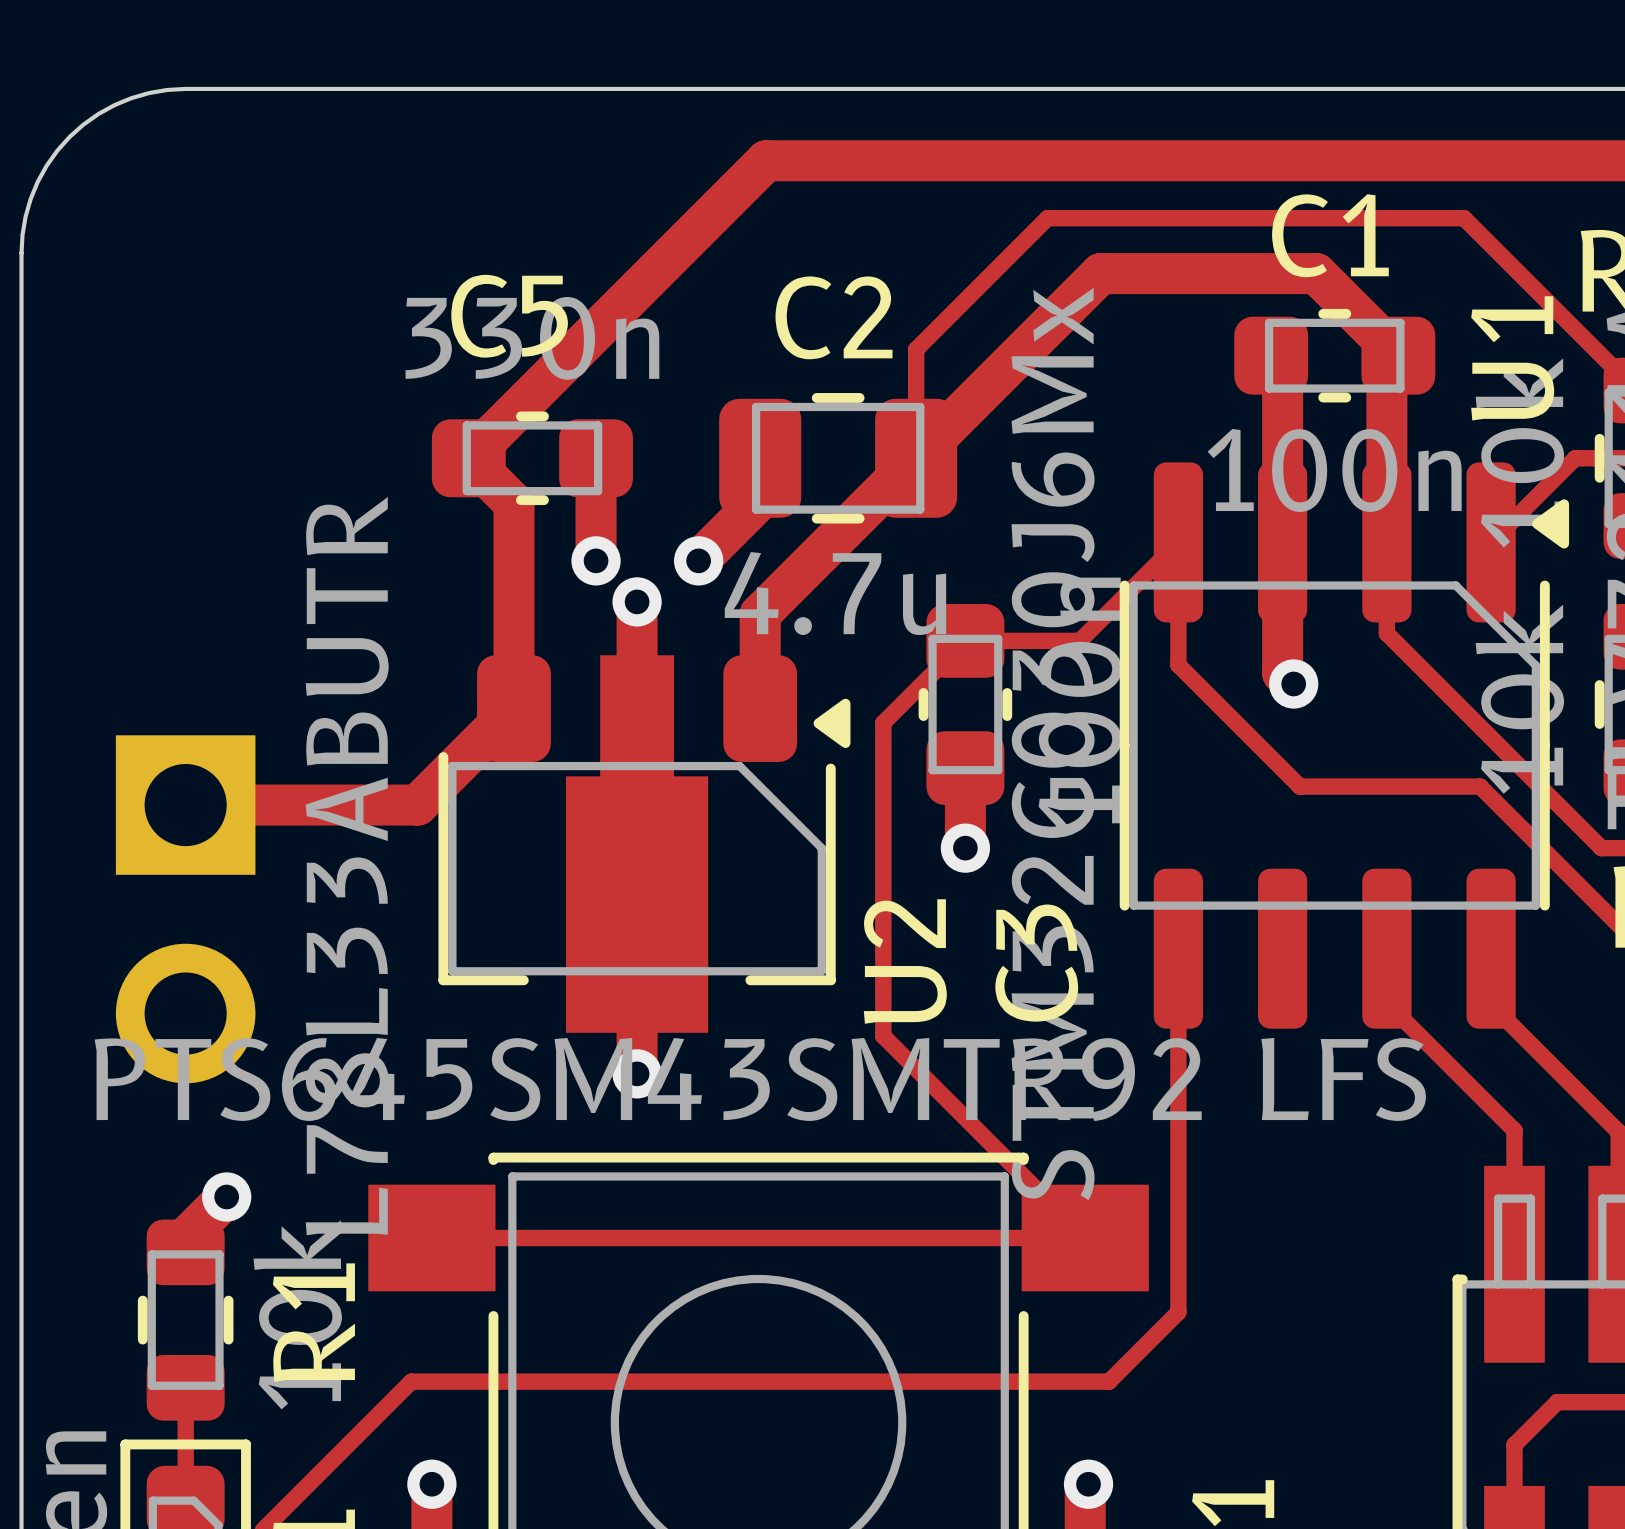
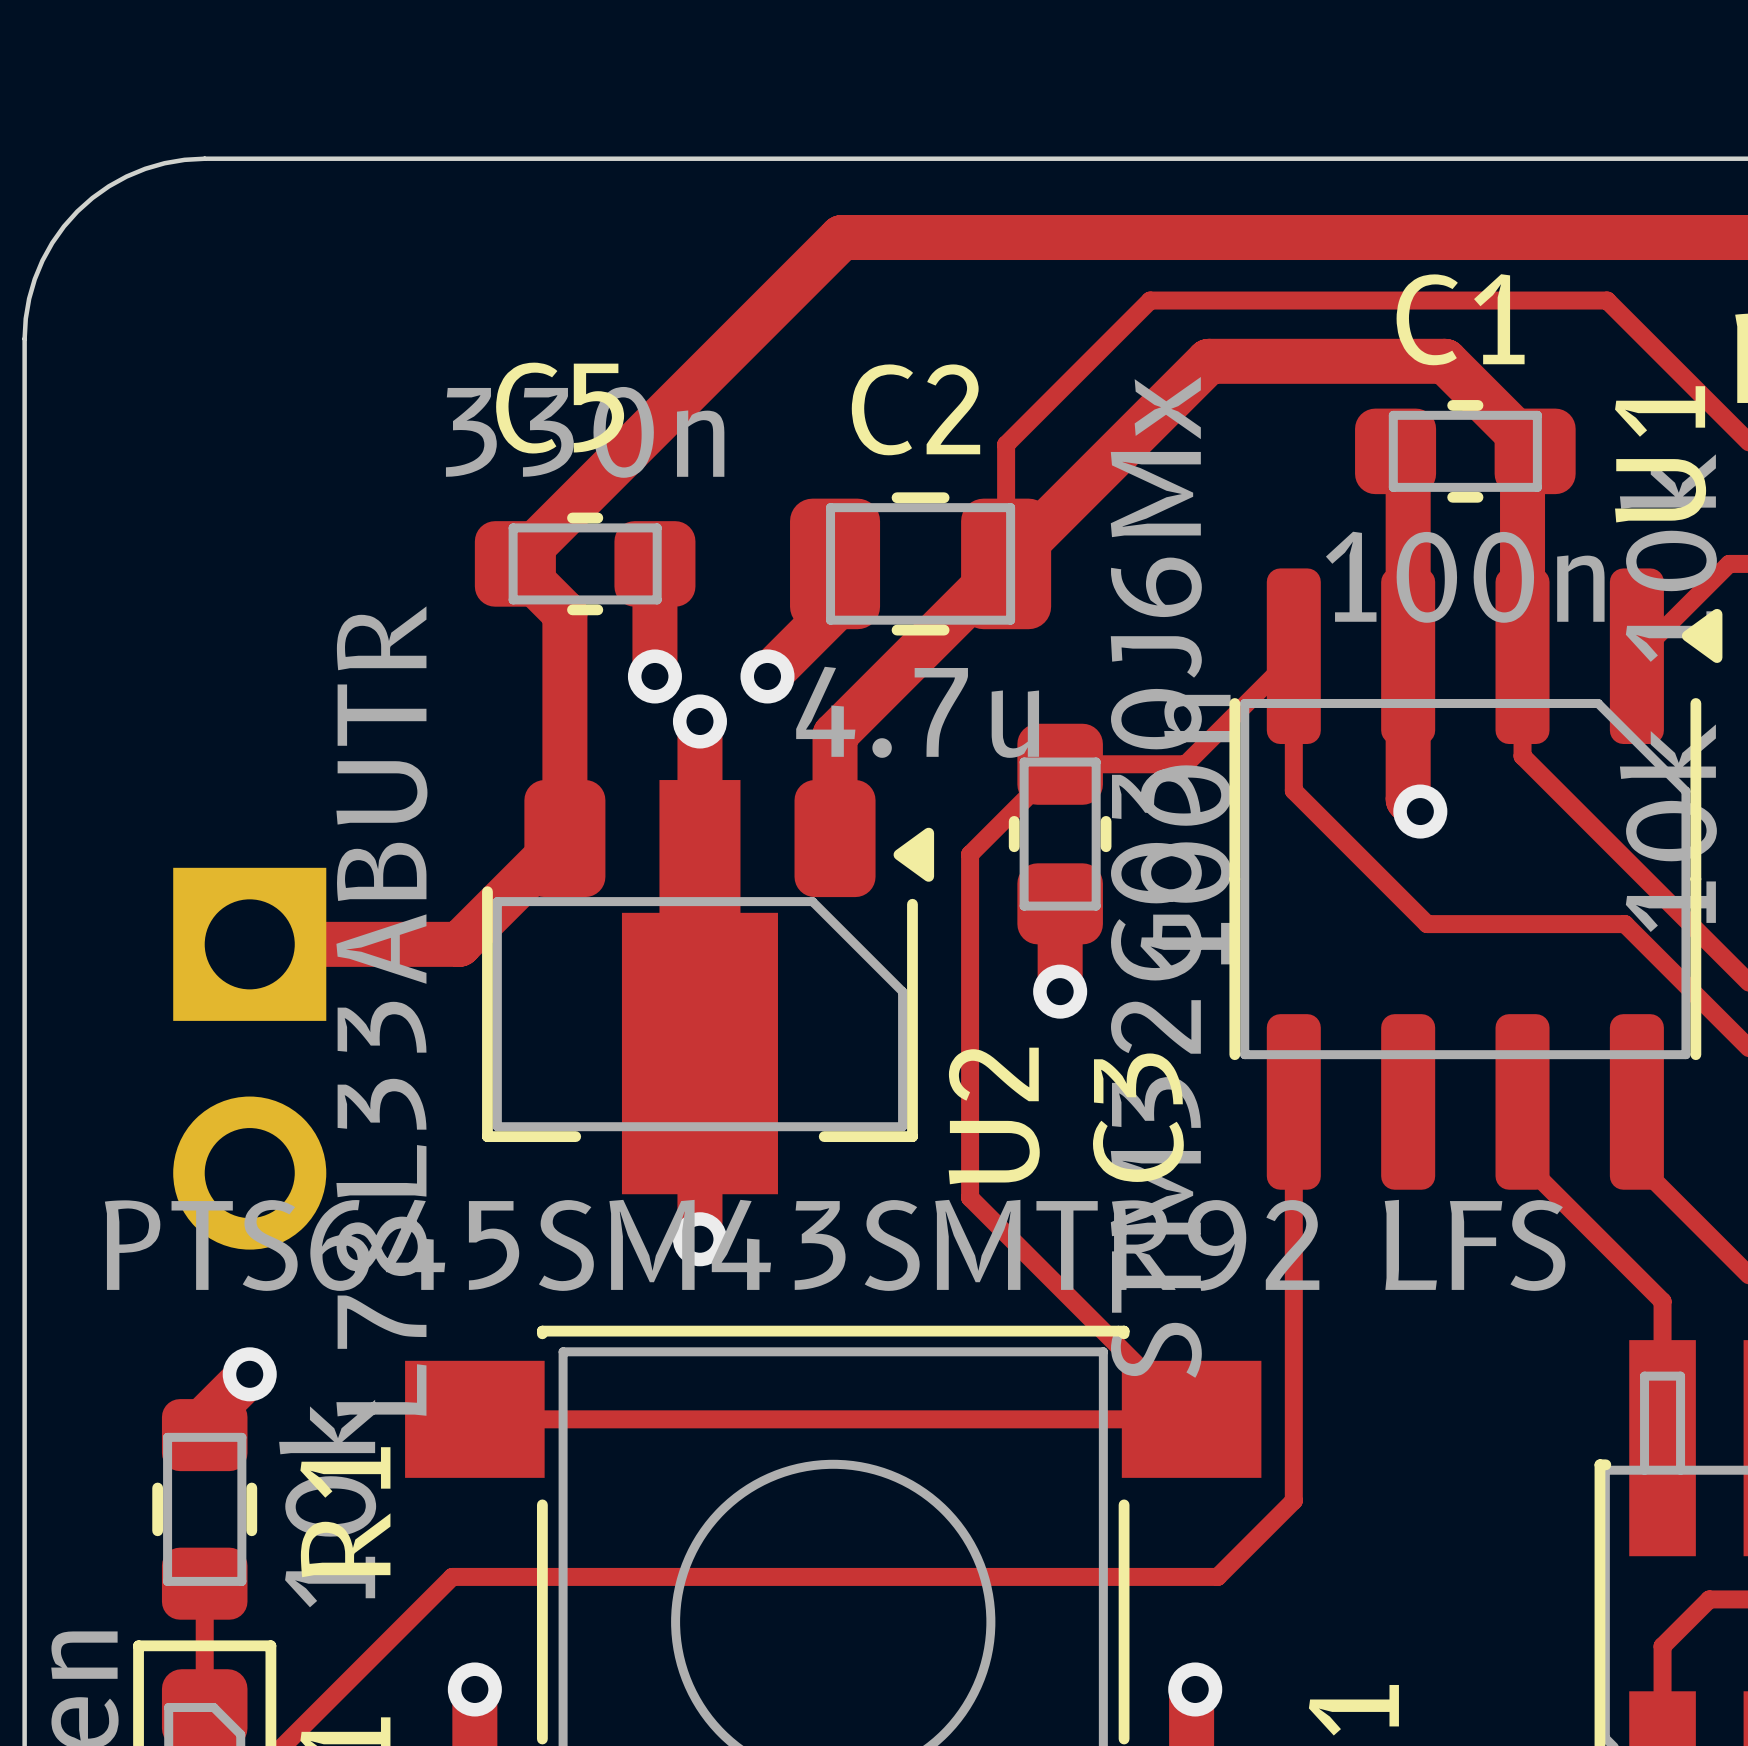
part position: (185, 909) -> (249, 1058)

